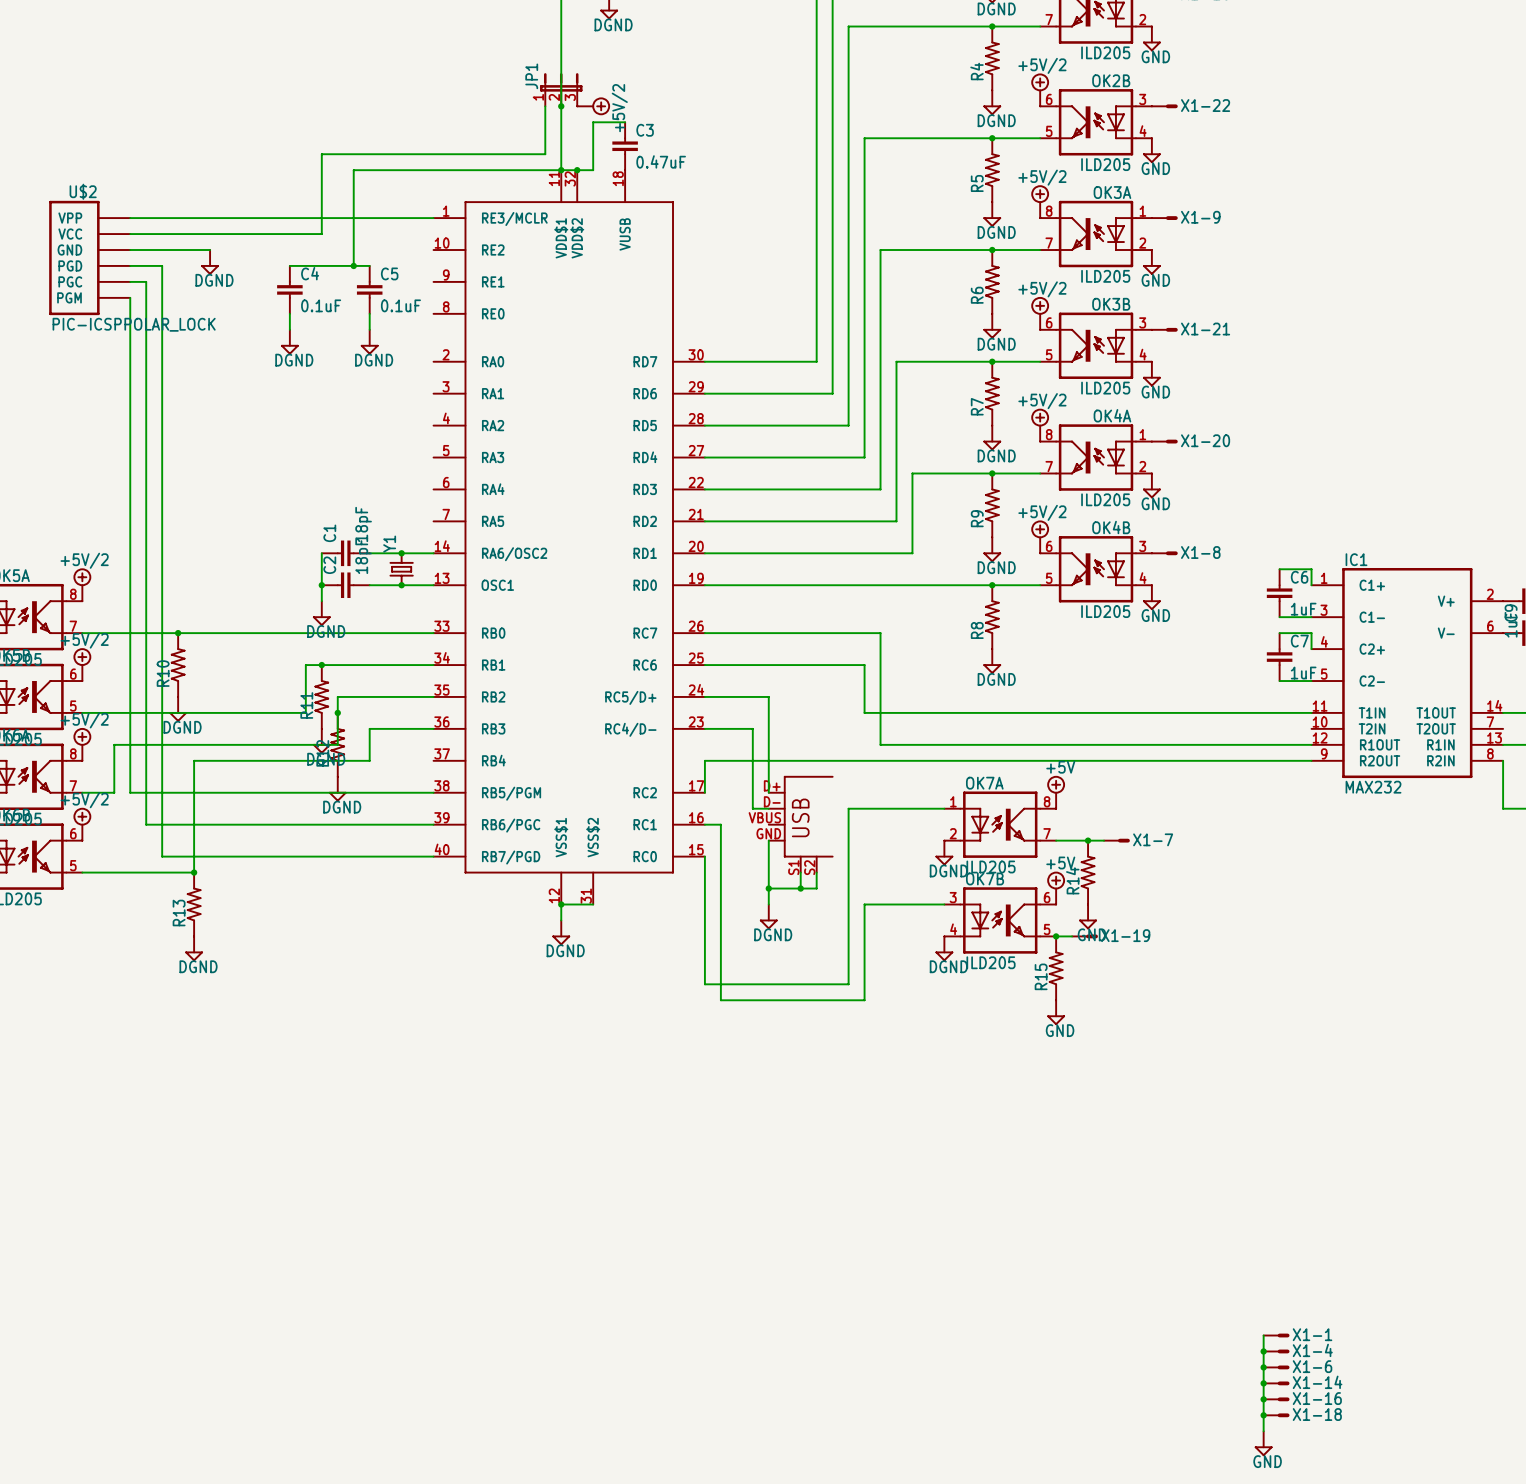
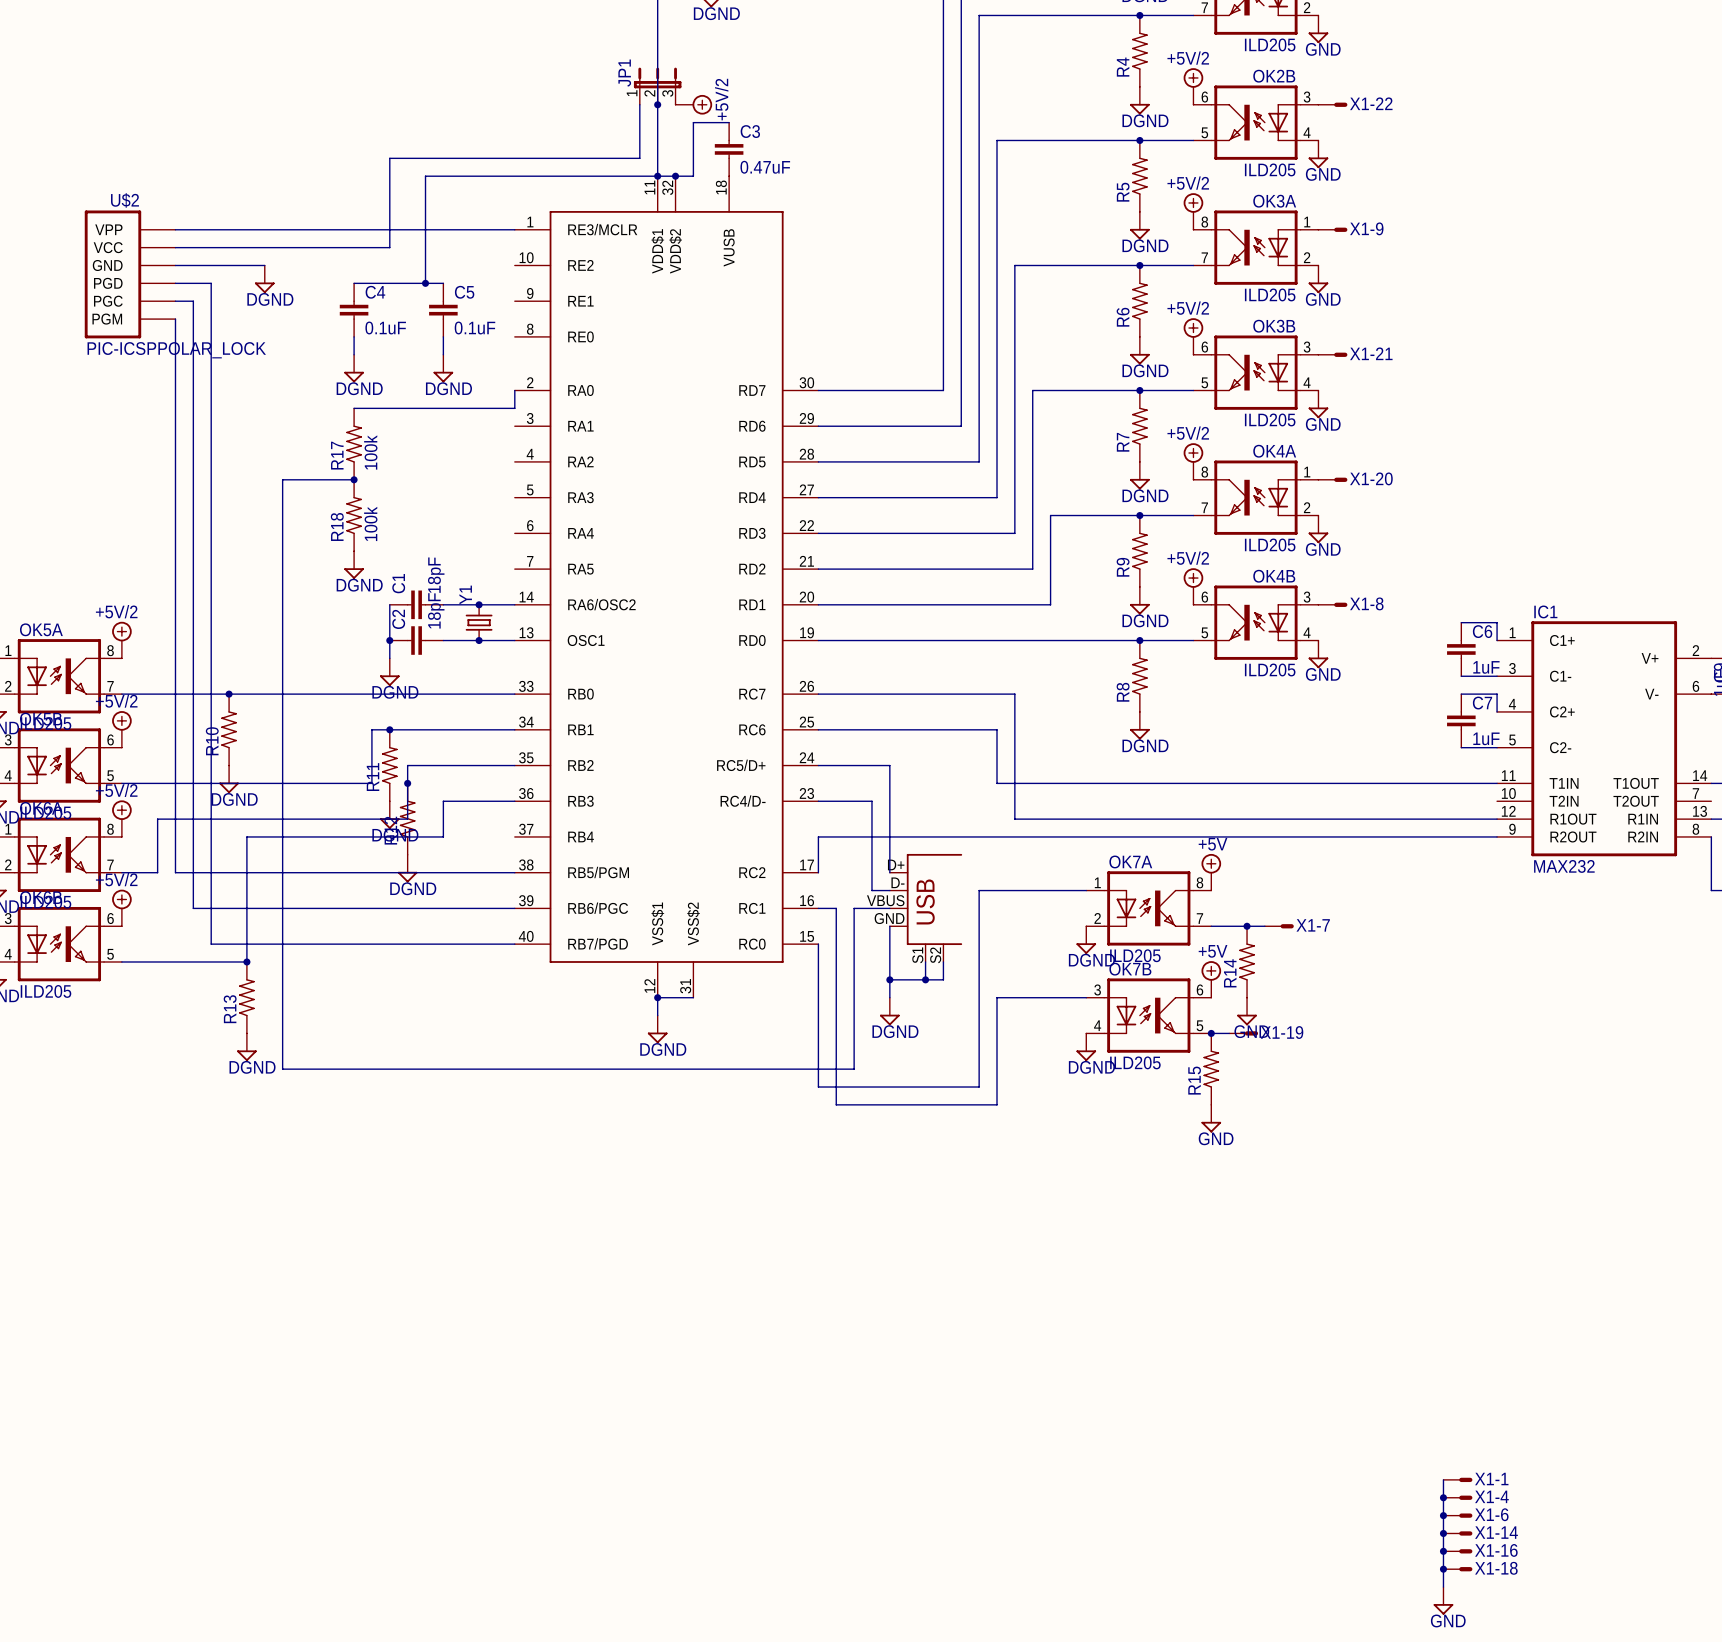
wire: none -> (514, 390) (514, 408) (354, 408)
R17: none -> 100k (354, 444)
wire: none -> (354, 479) (282, 479) (282, 1069) (854, 1069) (854, 908) (889, 908)
junction: none -> (354, 479)
R18: none -> 100k (354, 515)
power symbol: none -> DGND (354, 565)

